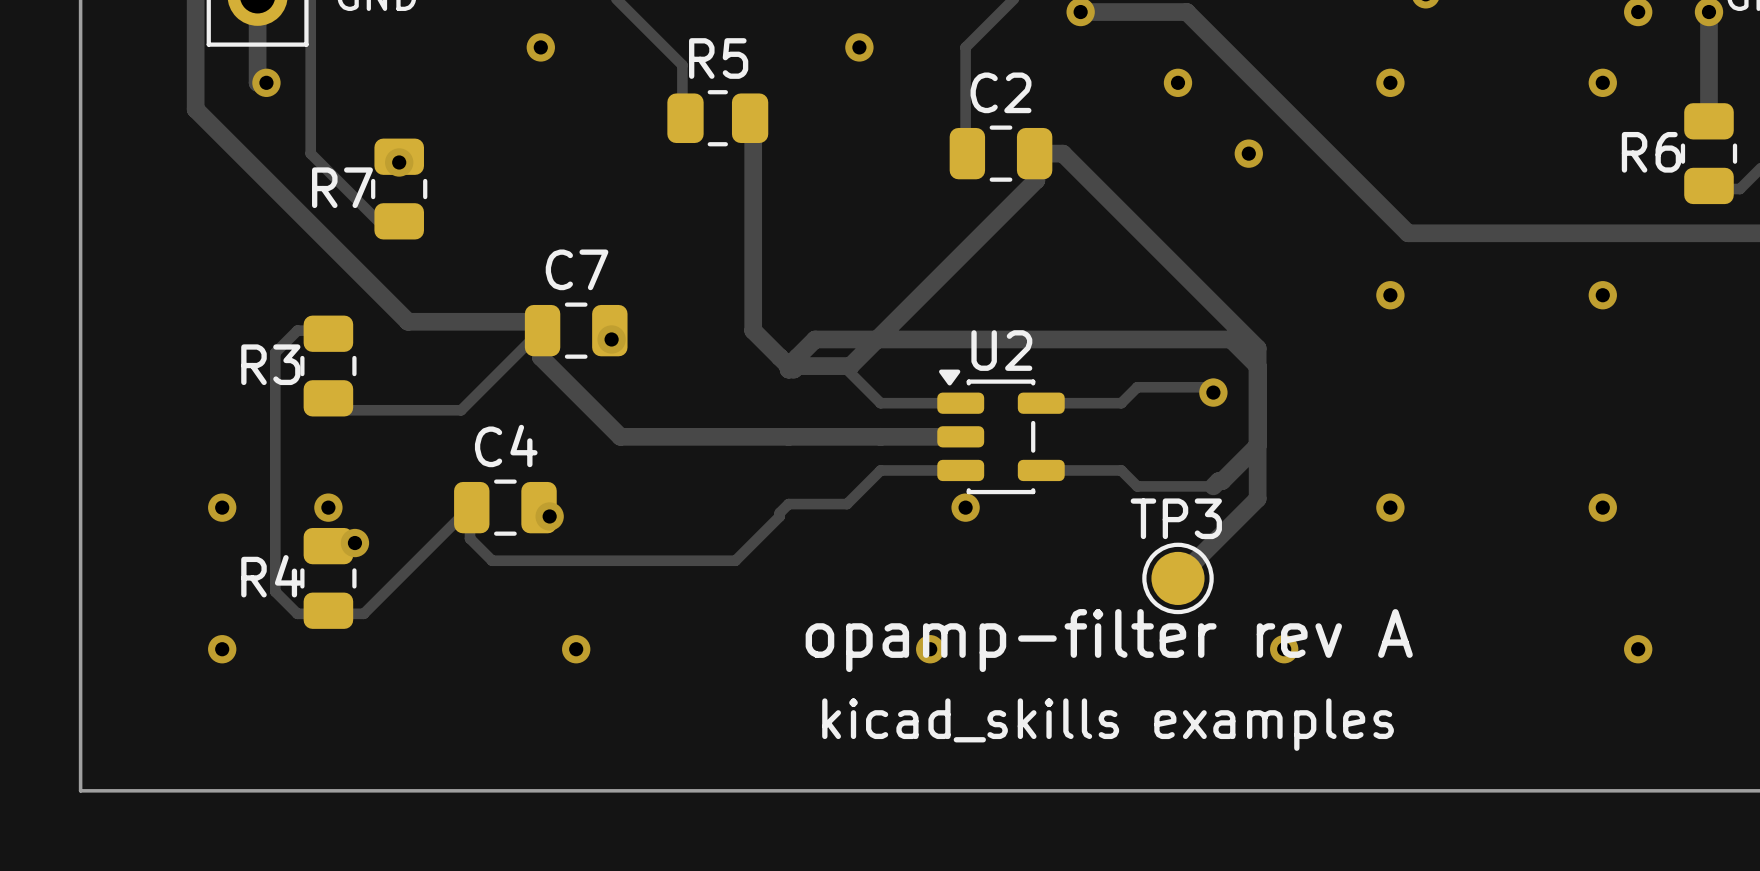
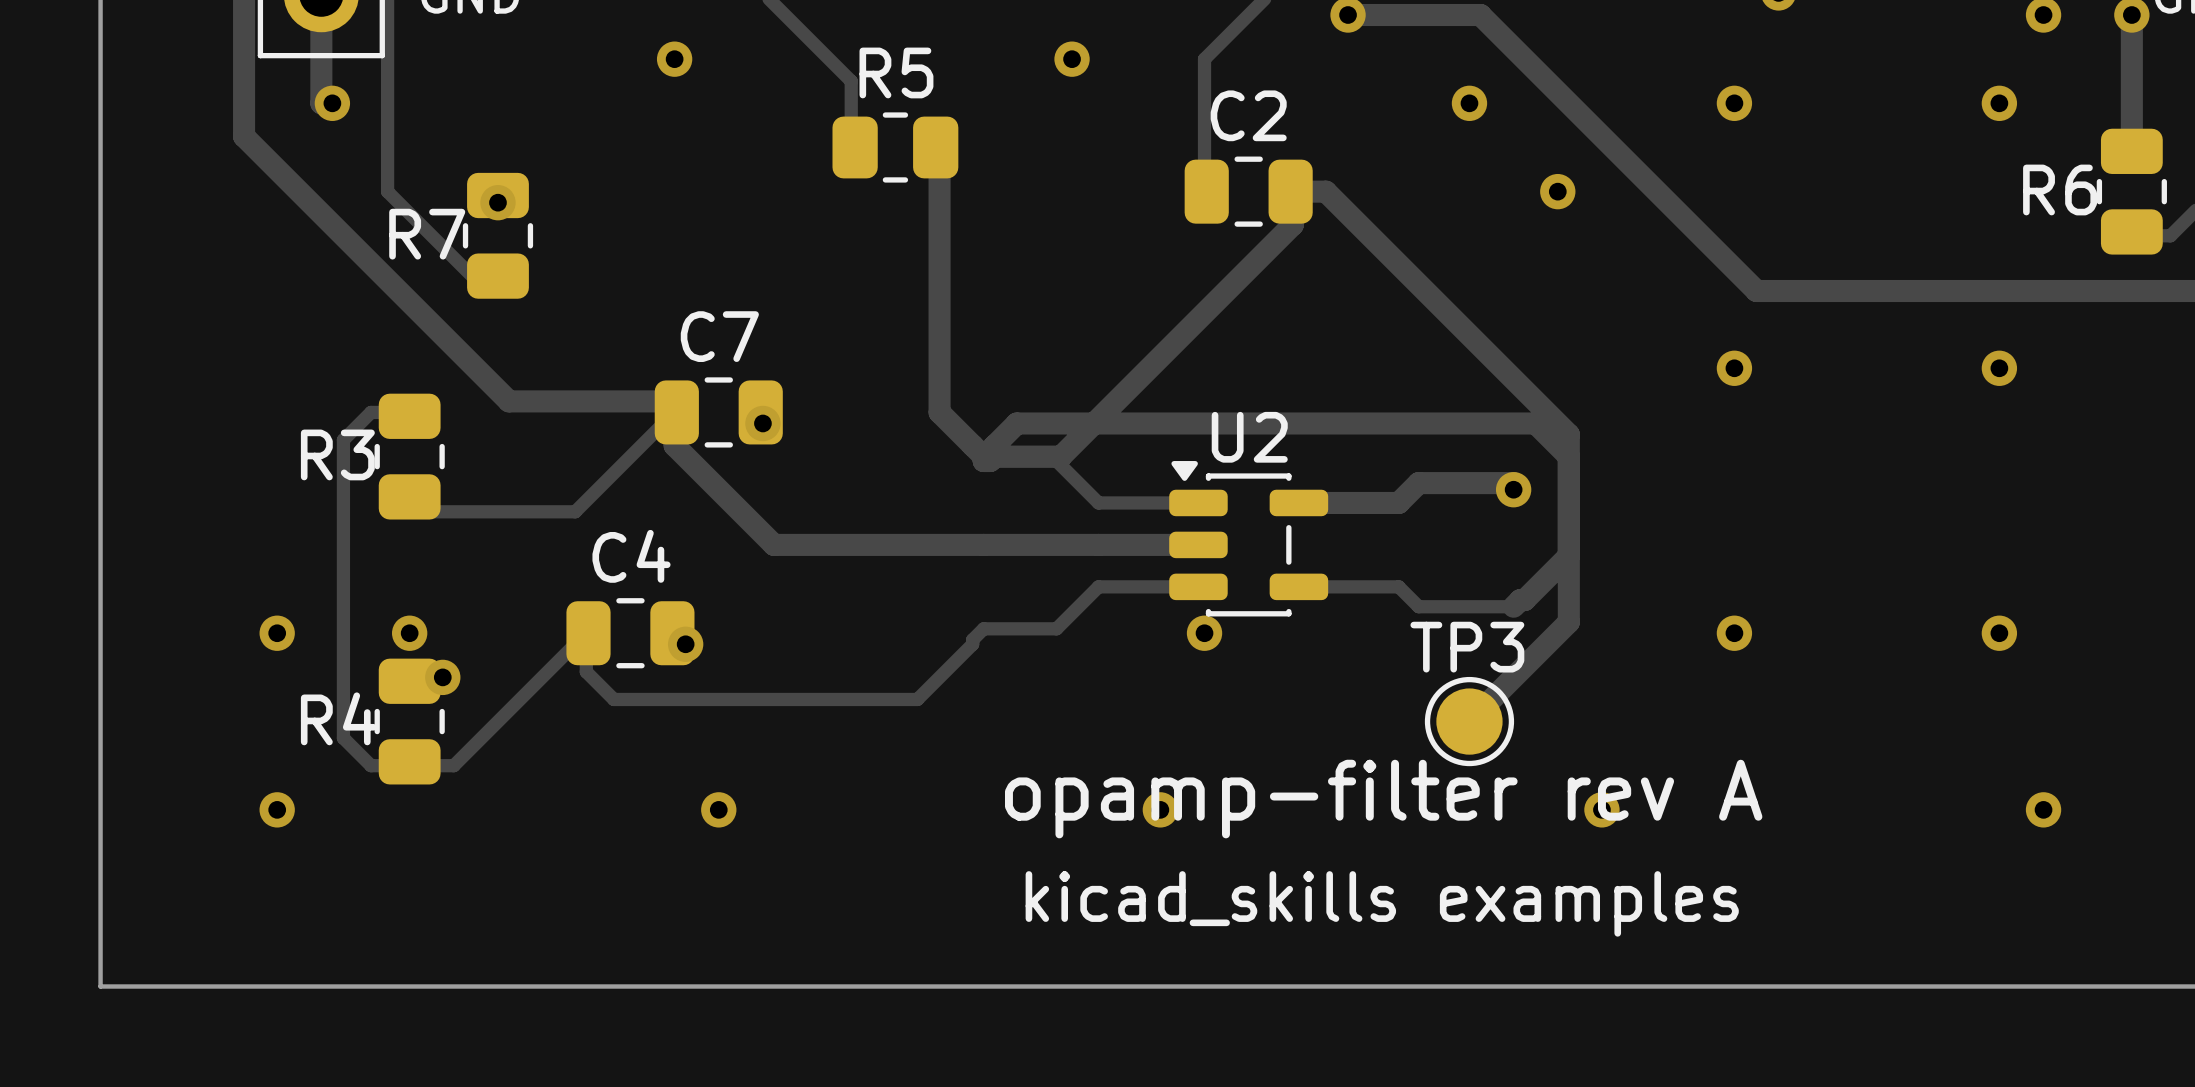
track width: thin (1213, 387) (1137, 387) (1121, 403) (1041, 403) -> thick (1513, 483) (1418, 483) (1398, 502) (1298, 502)

